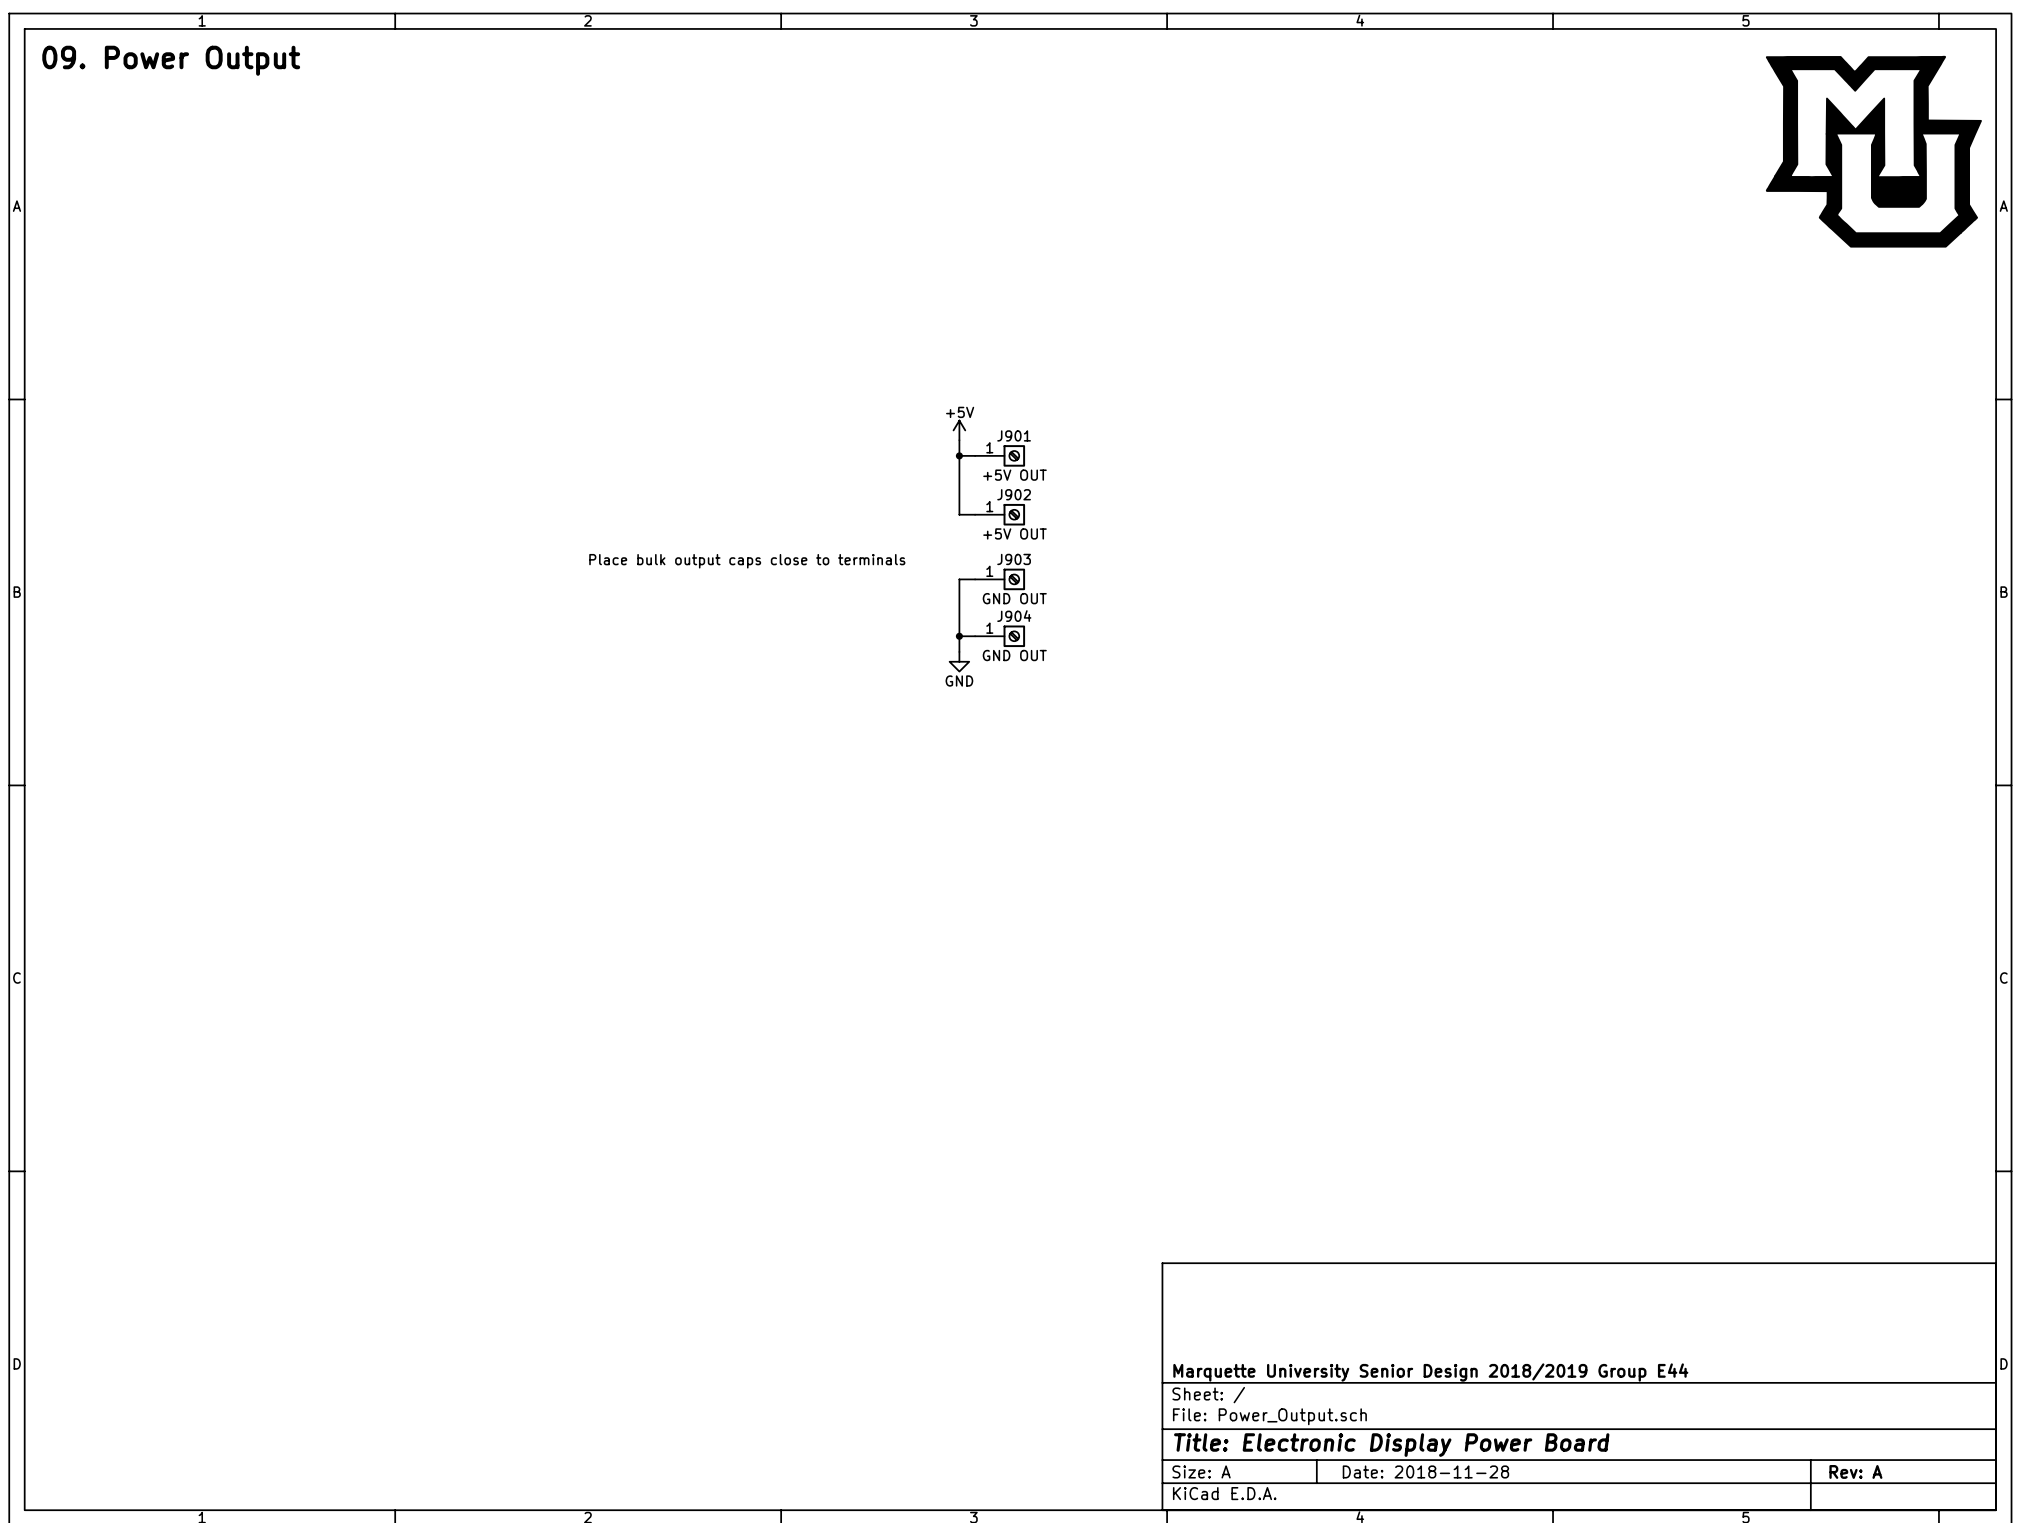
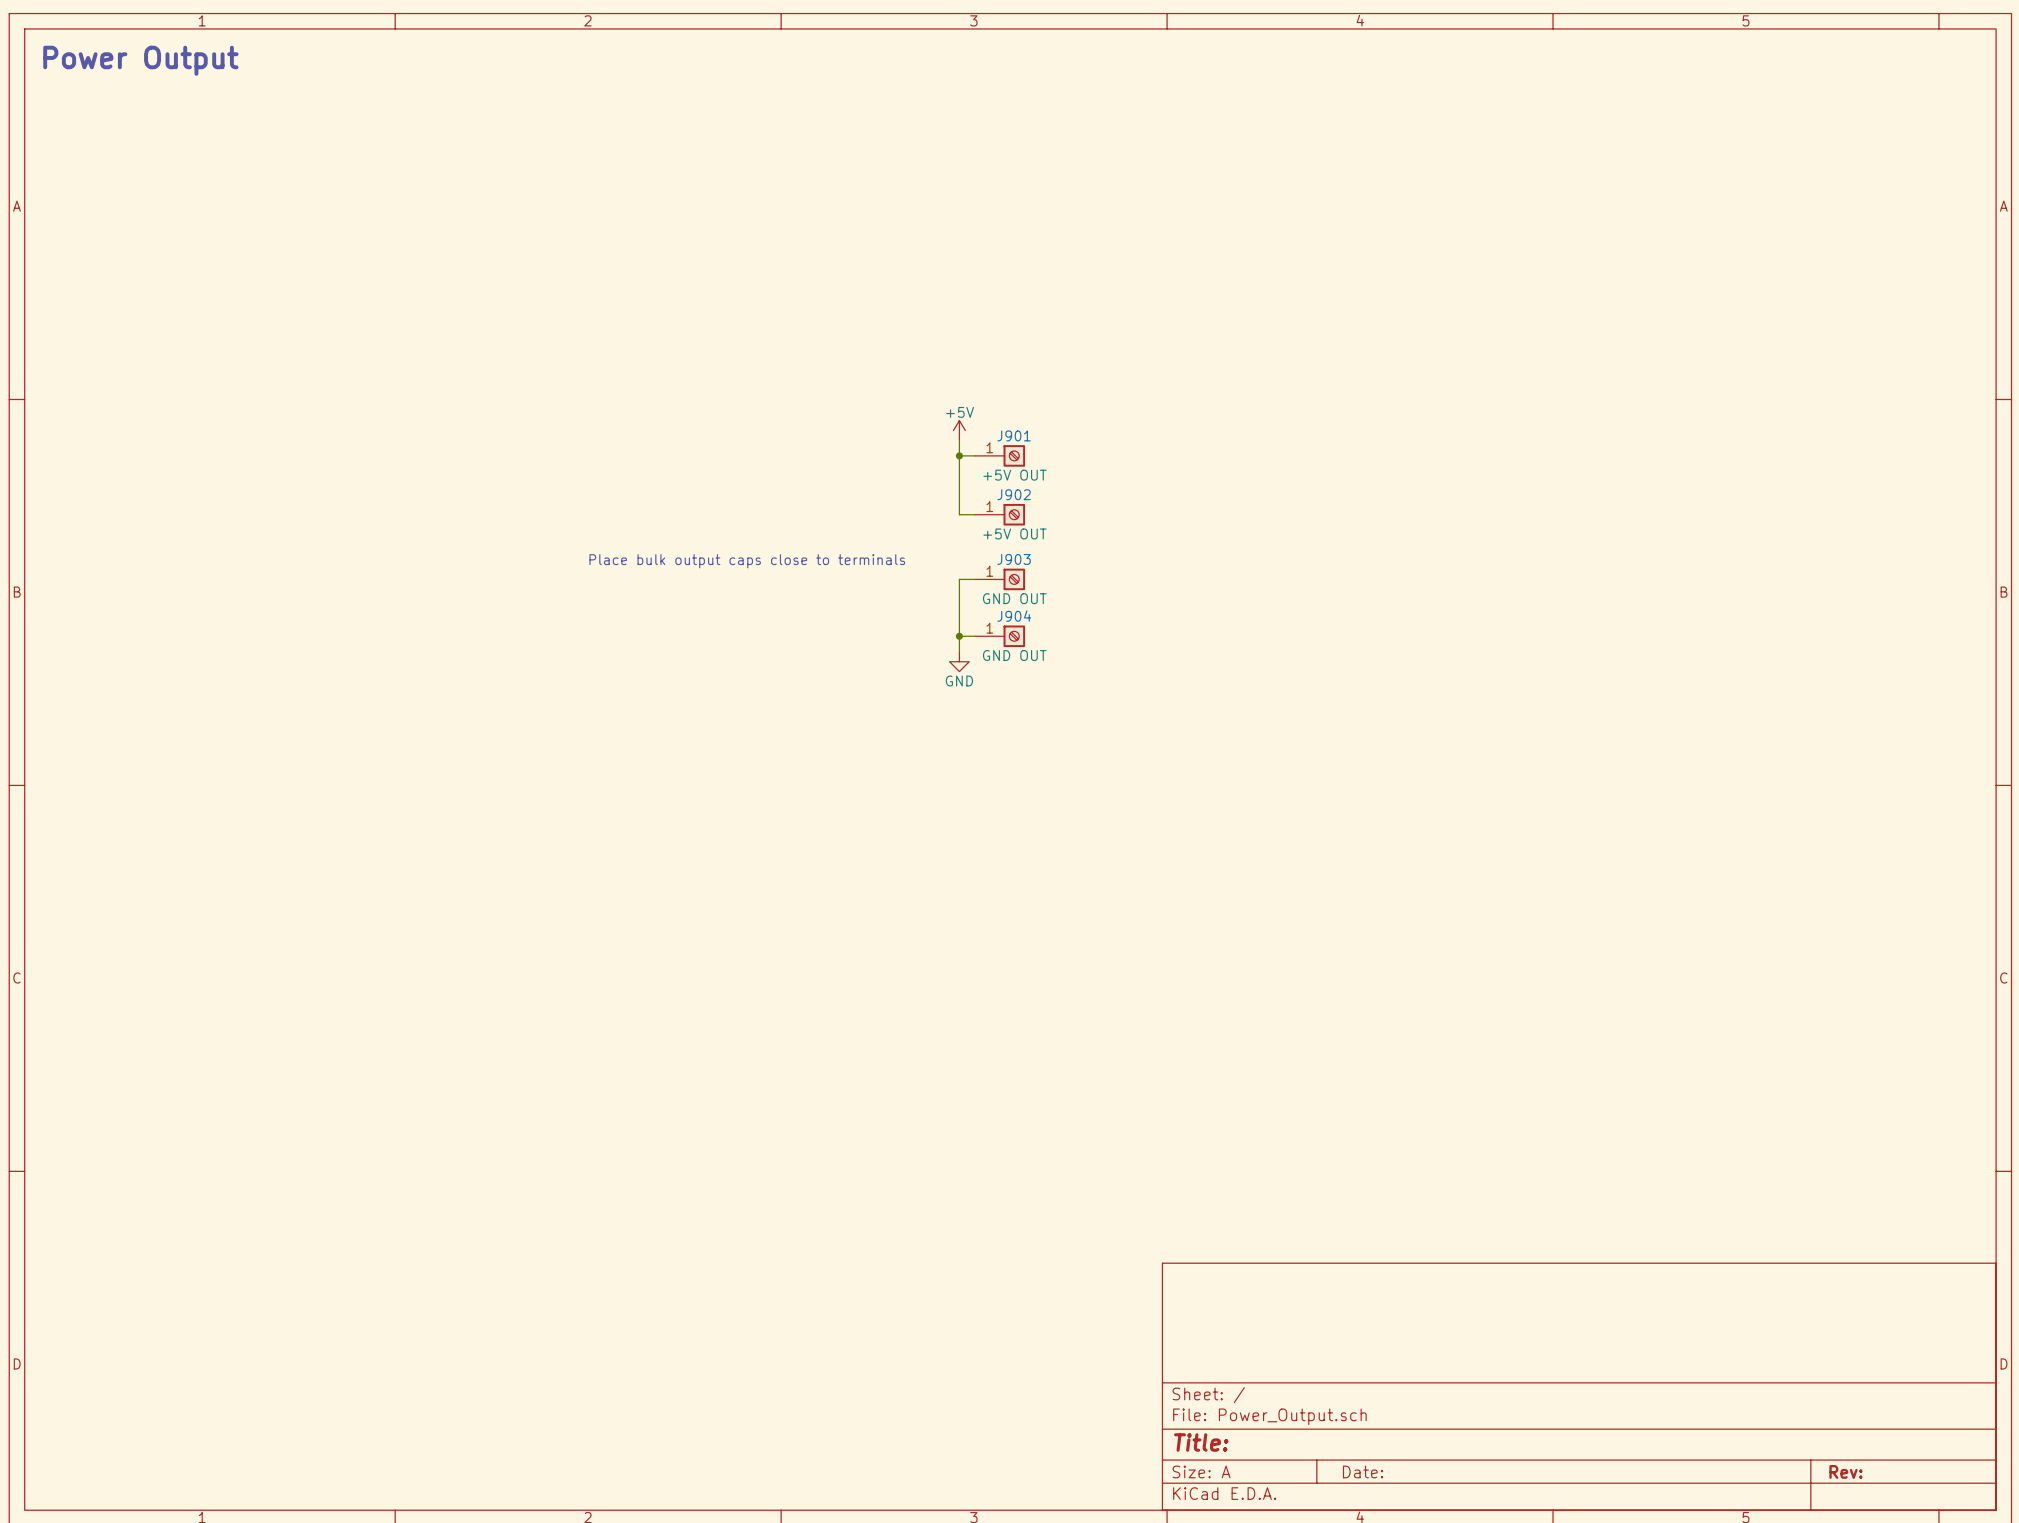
text: 09. Power Output (171, 60) -> Power Output (140, 60)
power symbol: (1873, 151) -> none
title block: Marquette University Senior Design 2018/2019 Group E44 (1430, 1372) -> none
title block: Title: Electronic Display Power Board (1391, 1445) -> Title: (1201, 1442)
title block: Date: 2018-11-28 (1425, 1471) -> Date: (1363, 1471)
title block: Rev: A (1855, 1471) -> Rev: (1845, 1471)

